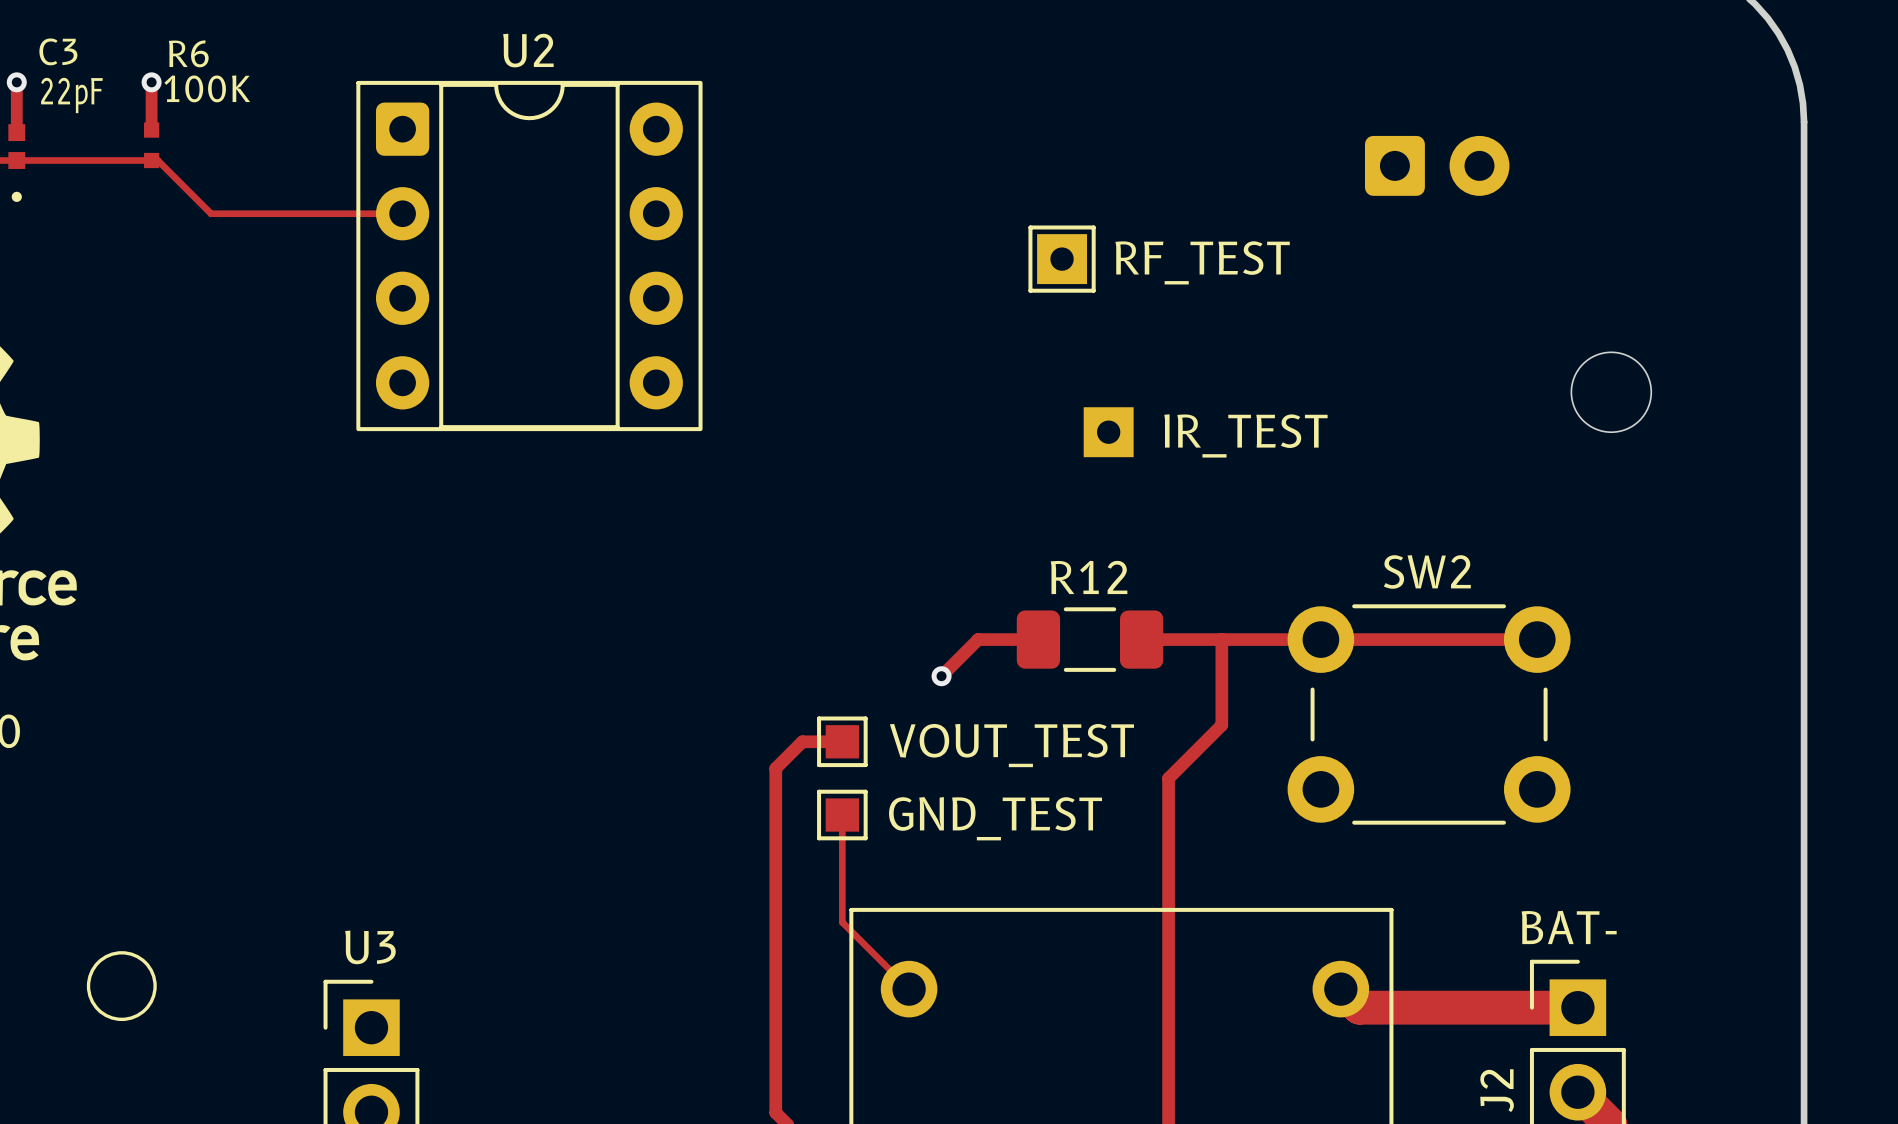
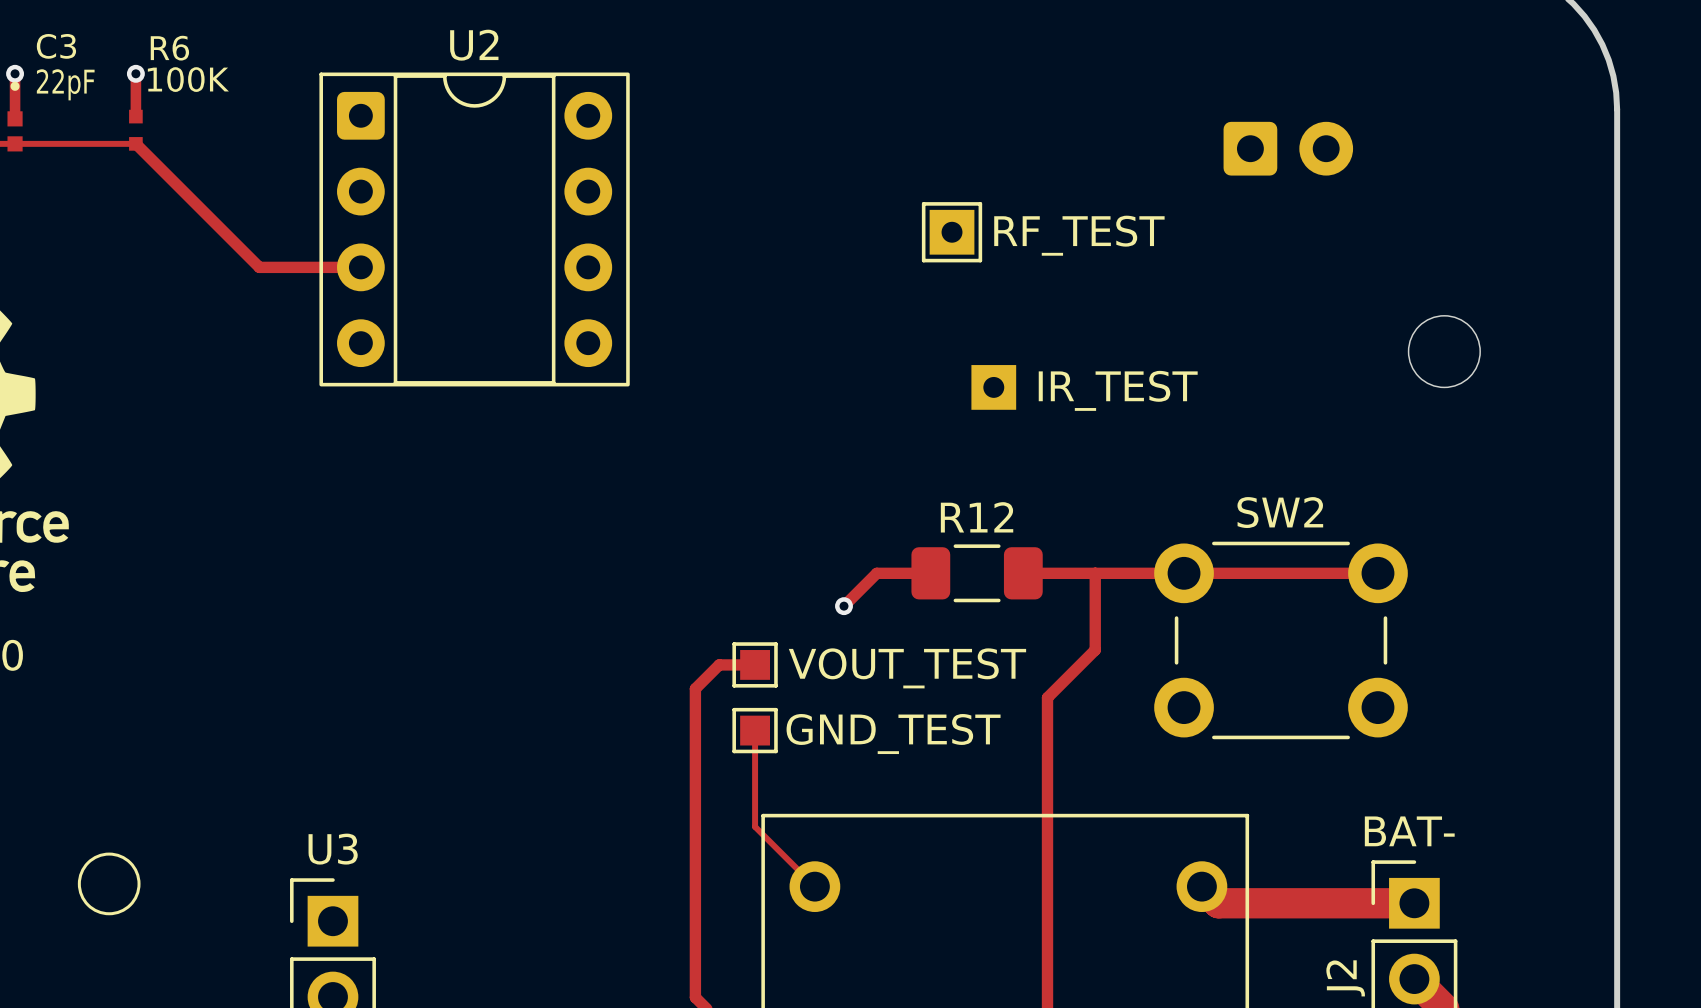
track: (151, 160) (157, 160) (211, 213) (402, 213) -> (135, 143) (259, 267) (360, 267)
C3 rotation: 0° (16, 163) -> 180° (15, 116)

